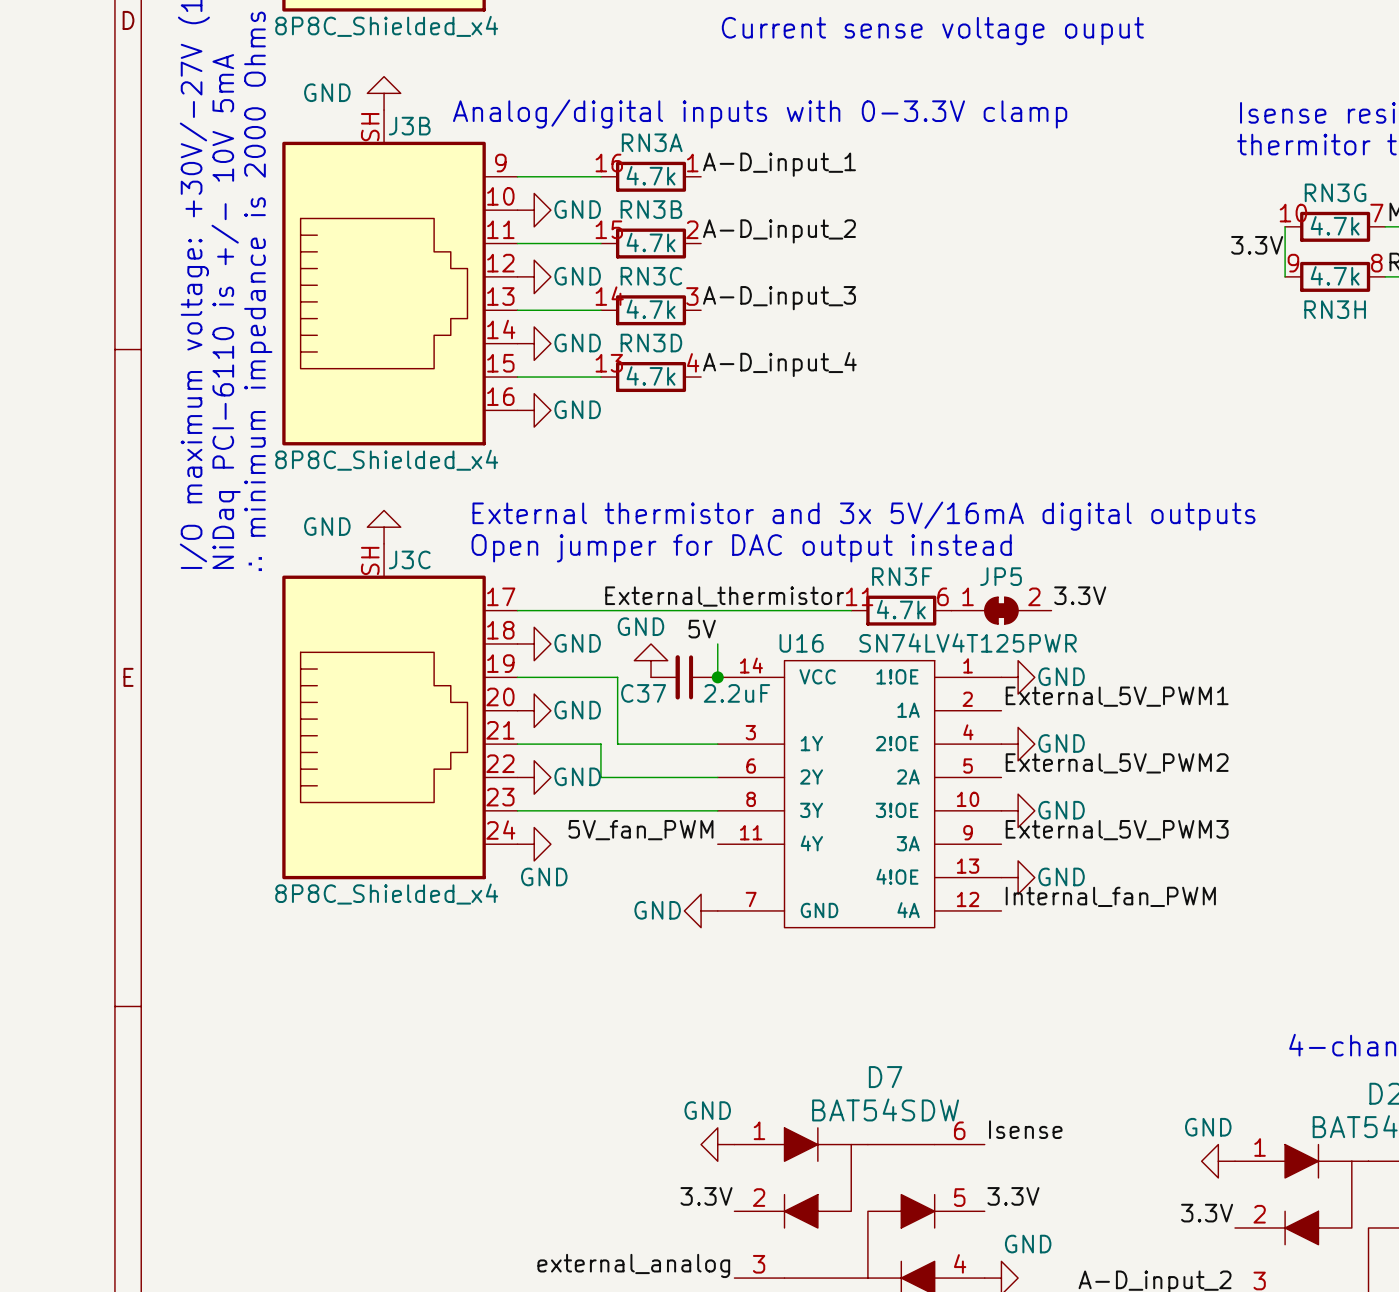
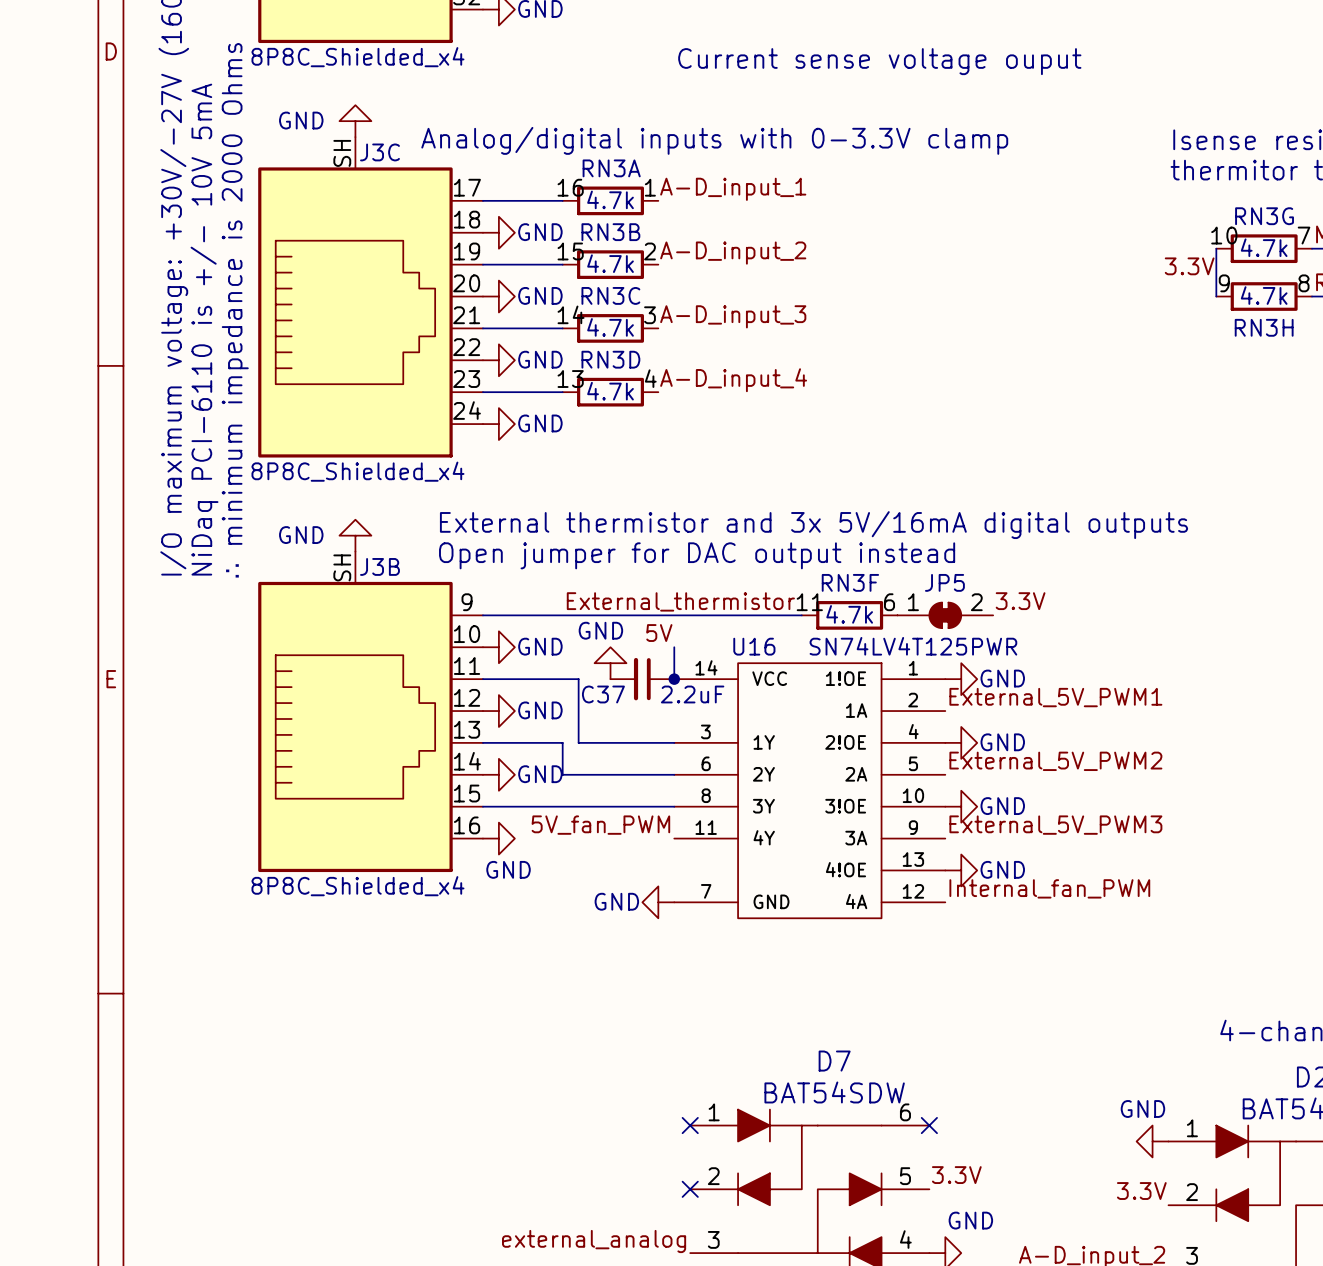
J3B position: (399, 277) -> (370, 711)
J3C position: (399, 711) -> (370, 297)
label: Isense (1025, 1129) -> none
power symbol: GND (717, 1144) -> none
no-connect mark: none -> (690, 1125)
no-connect mark: none -> (929, 1125)
label: 3.3V (706, 1196) -> none
no-connect mark: none -> (690, 1189)

